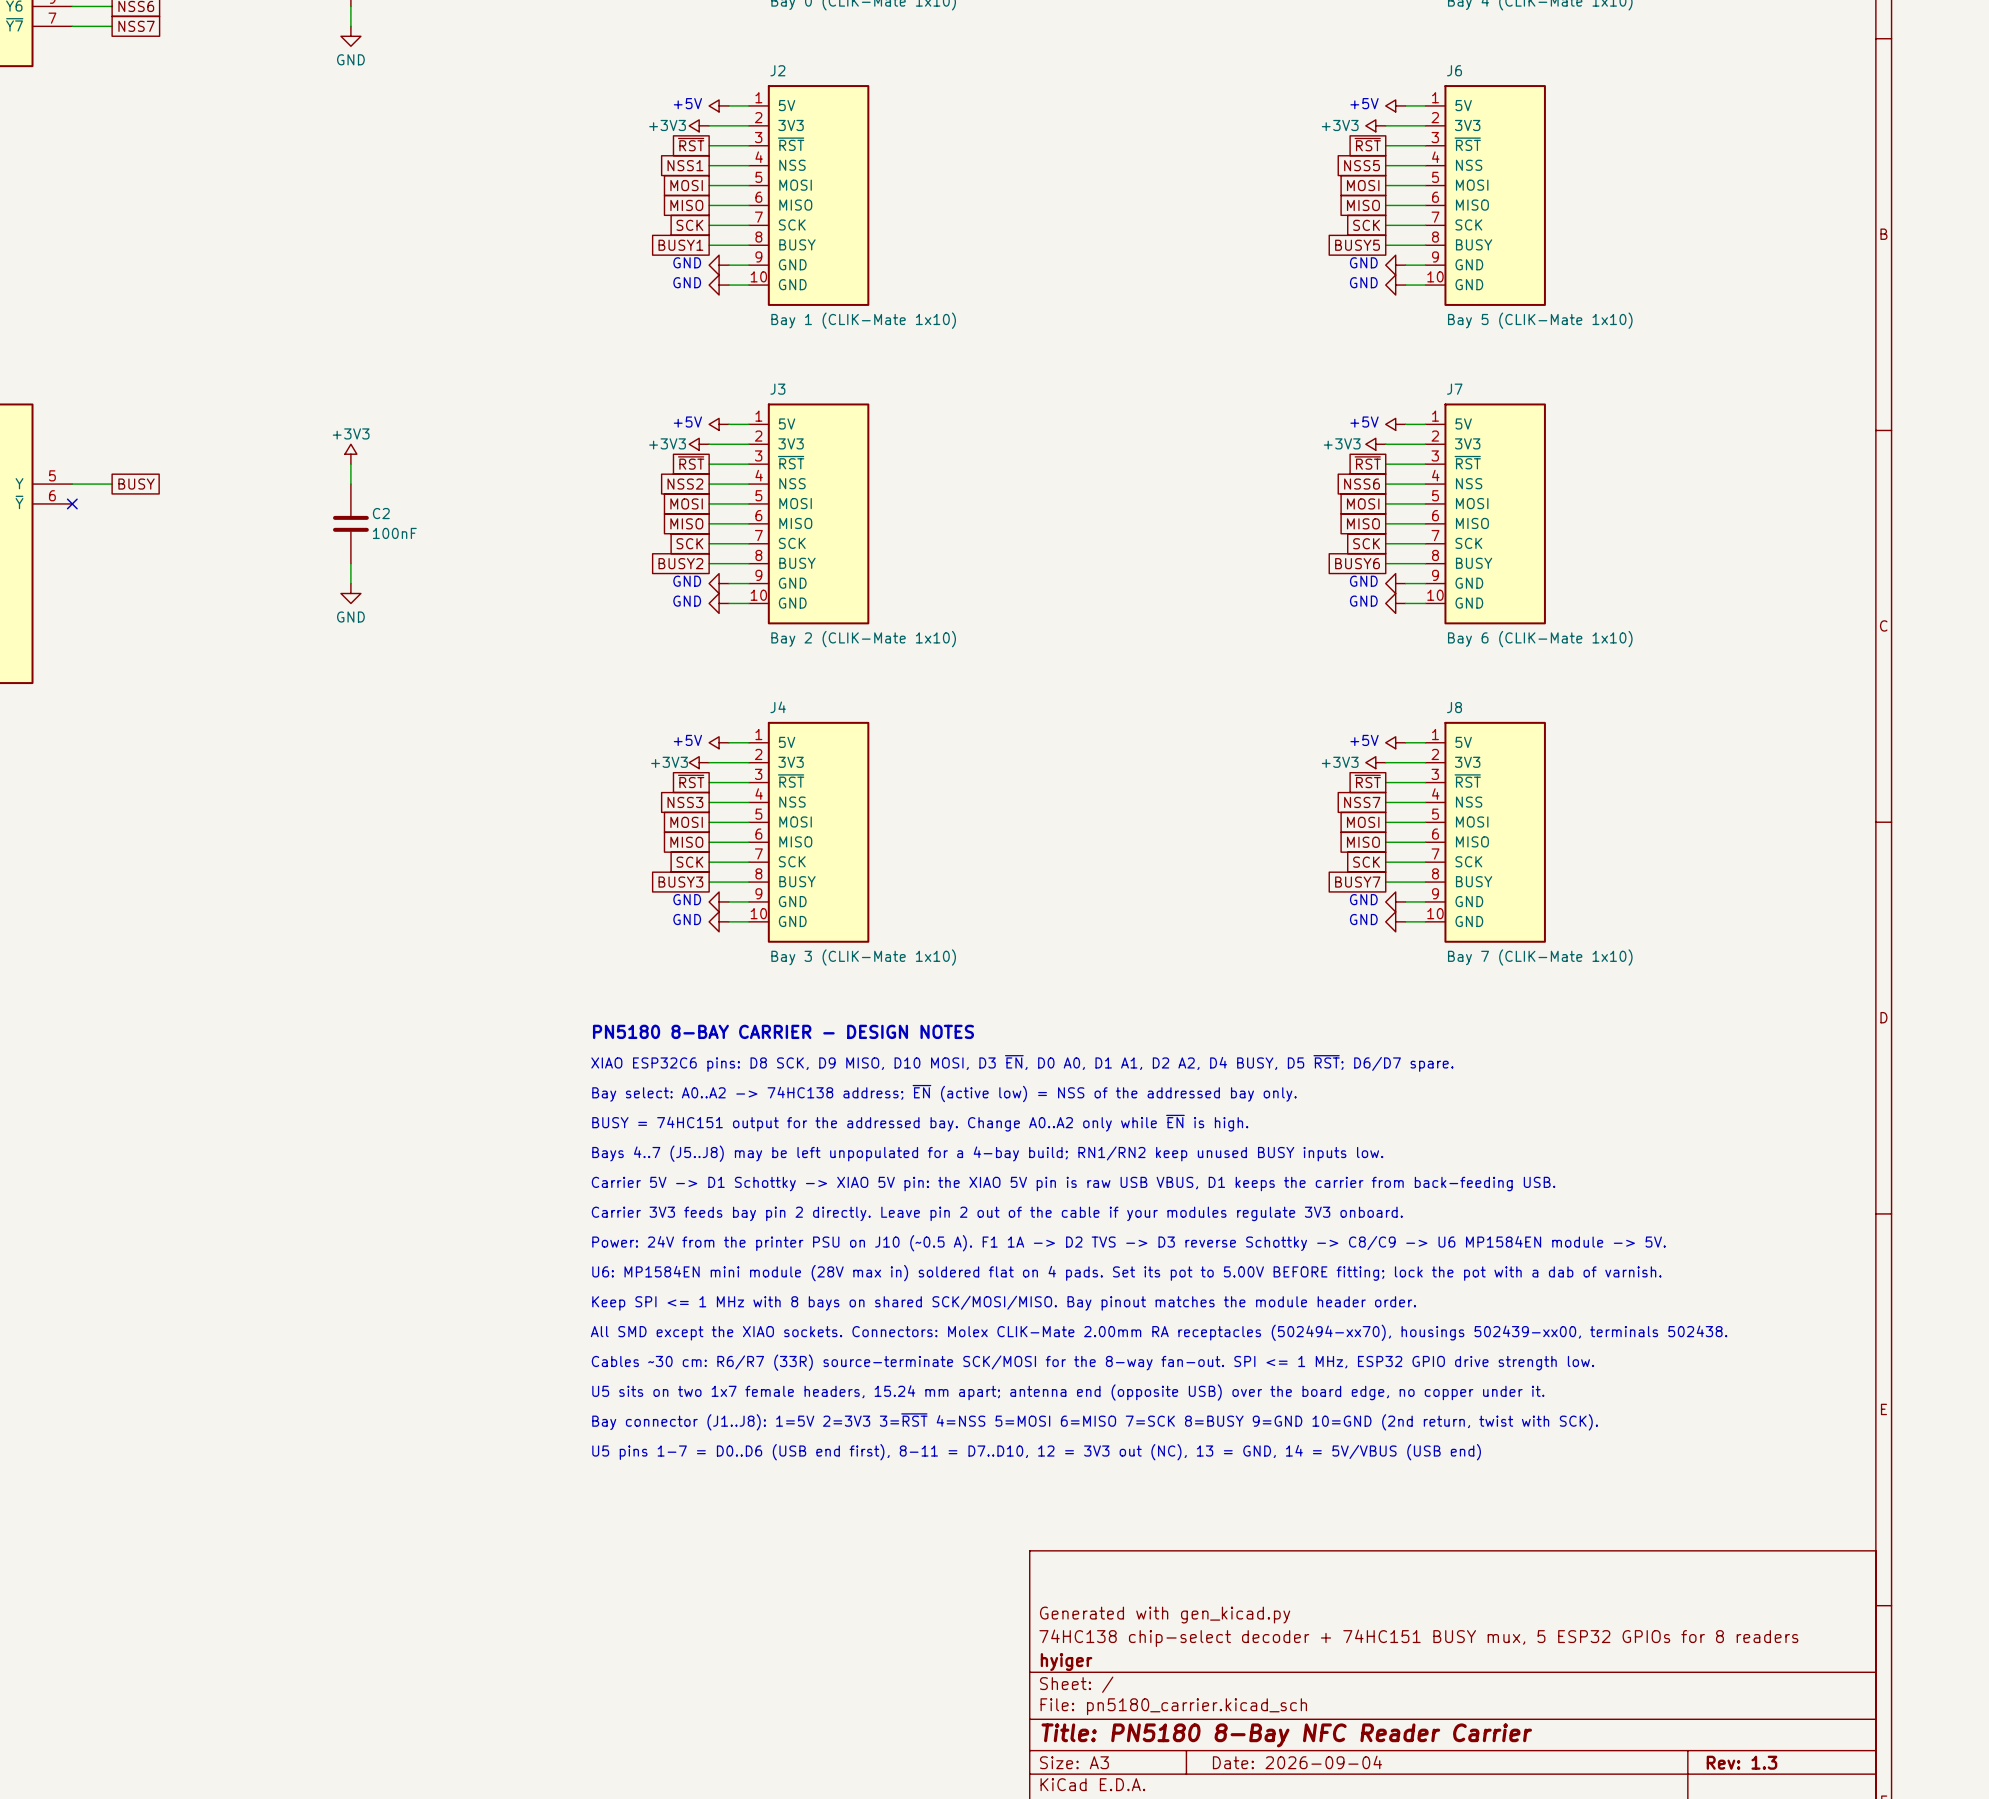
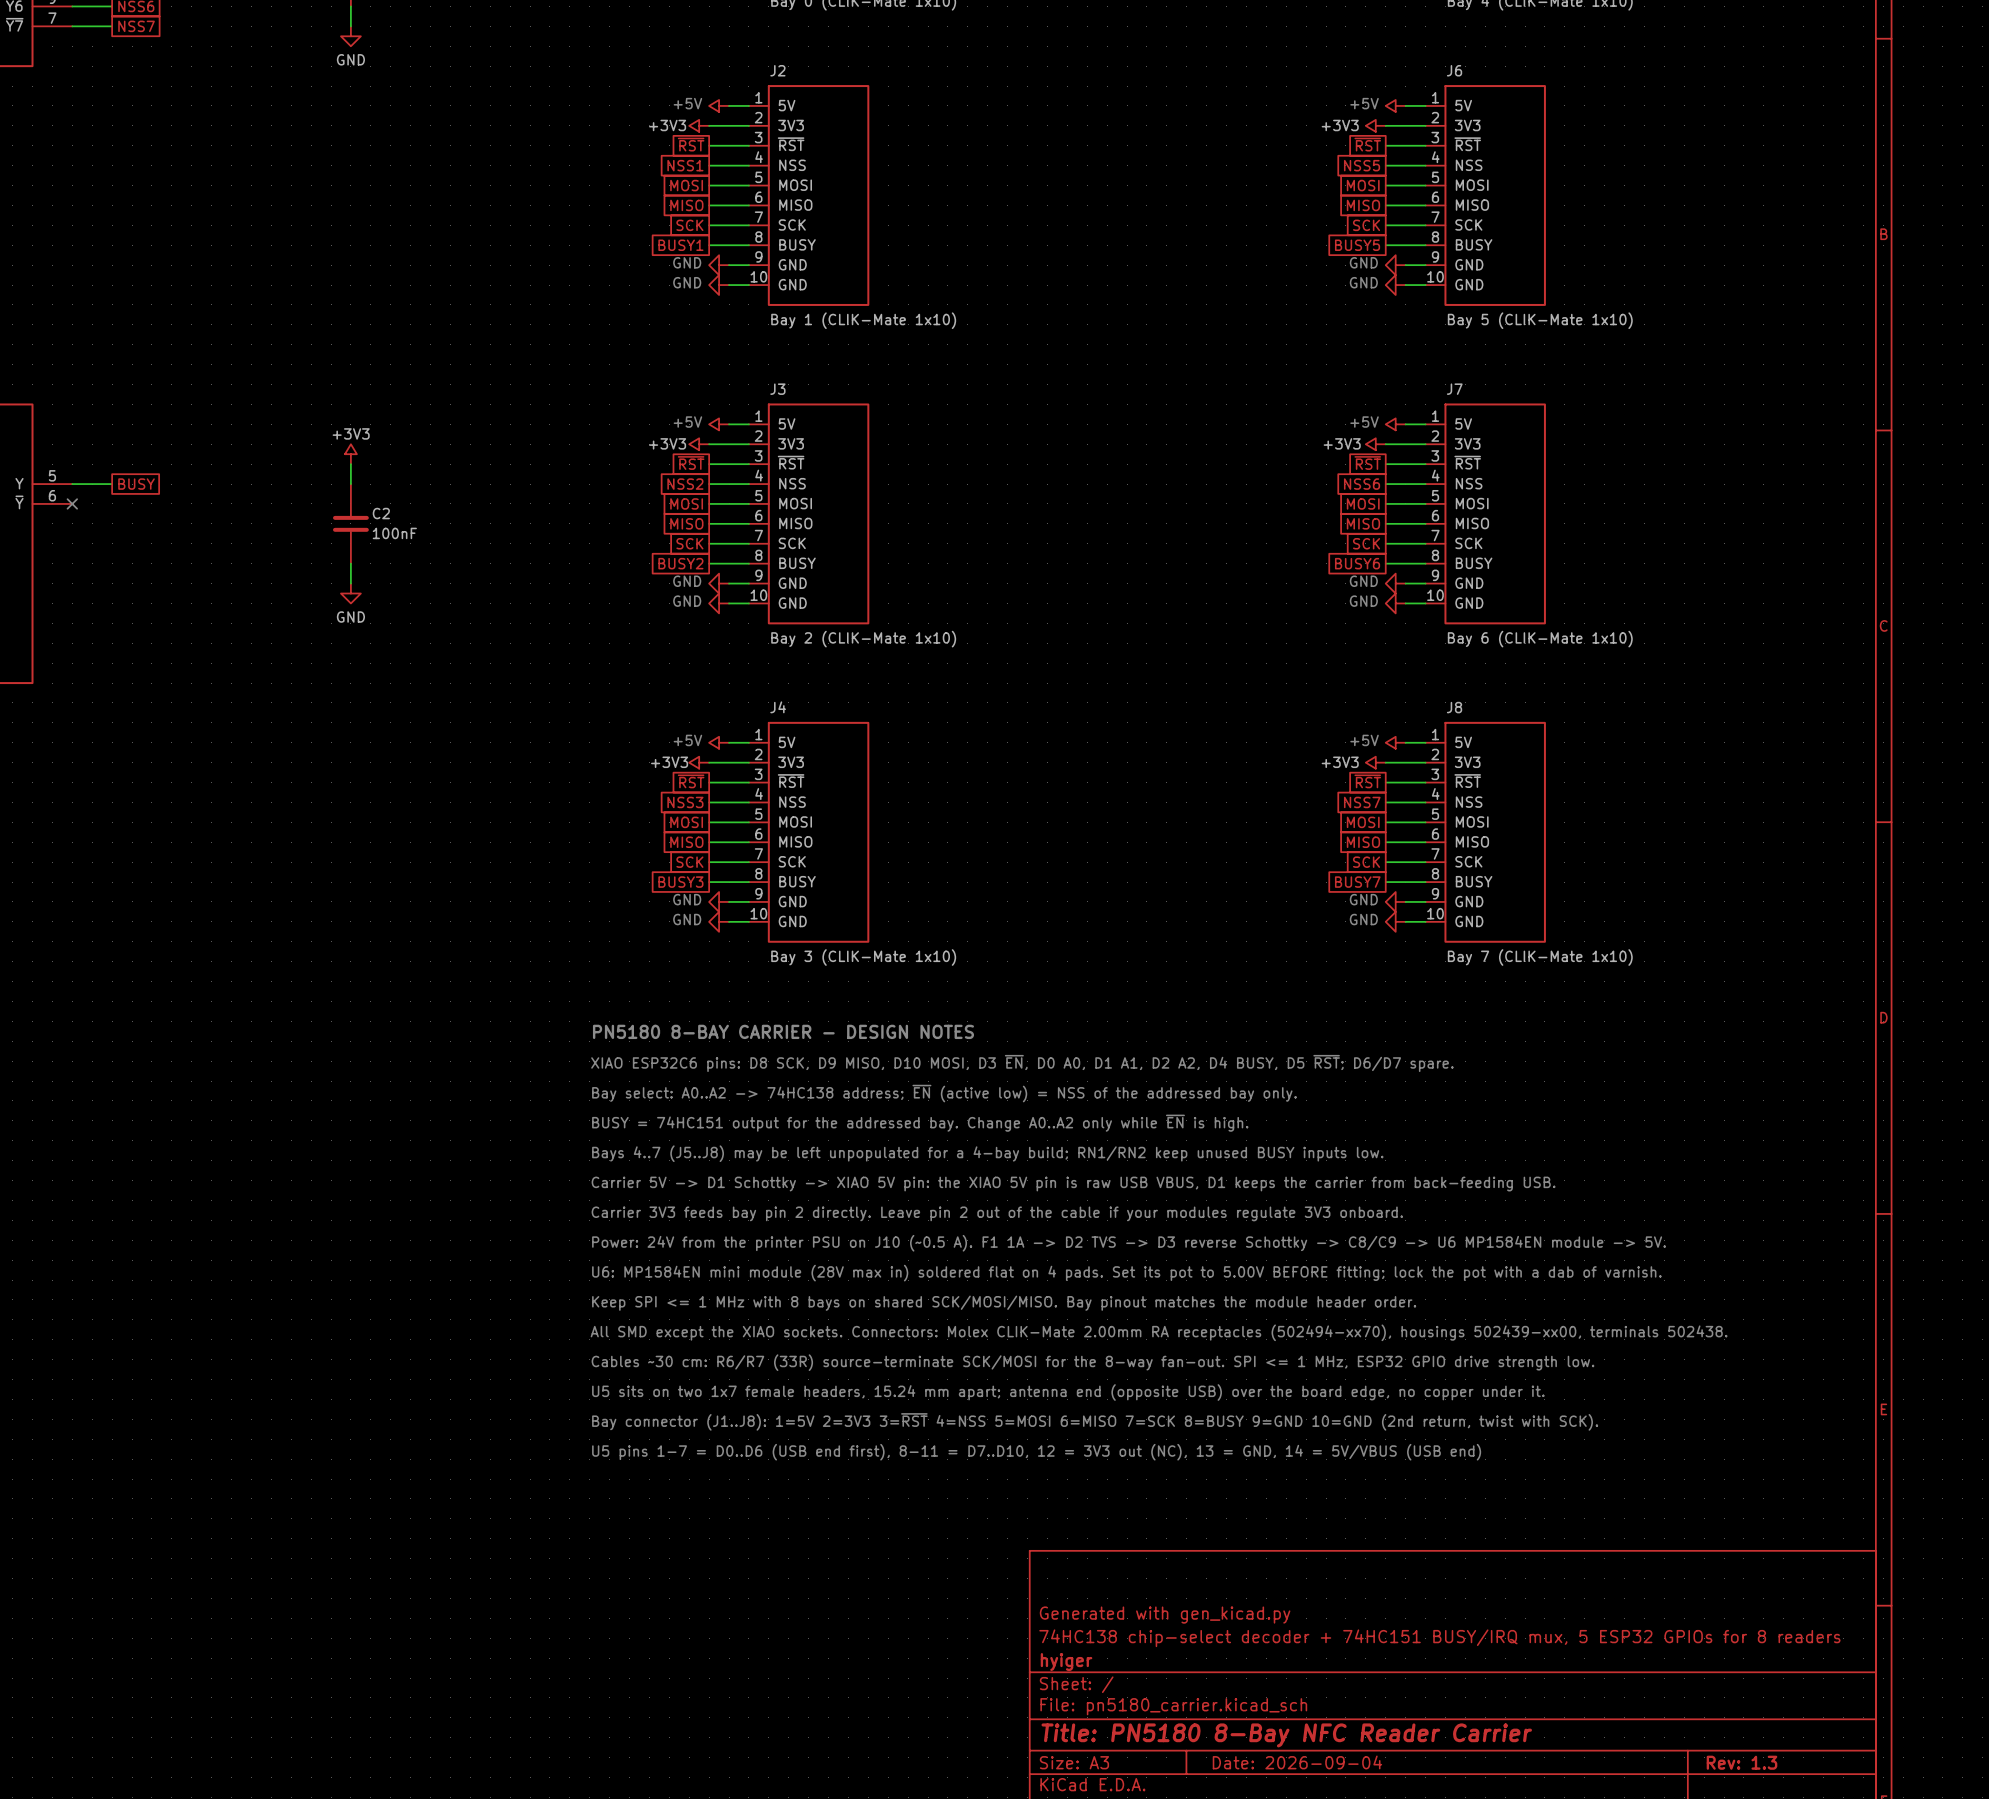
title block: 74HC138 chip-select decoder + 74HC151 BUSY mux, 5 ESP32 GPIOs for 8 readers (1418, 1638) -> 74HC138 chip-select decoder + 74HC151 BUSY/IRQ mux, 5 ESP32 GPIOs for 8 readers (1439, 1638)

